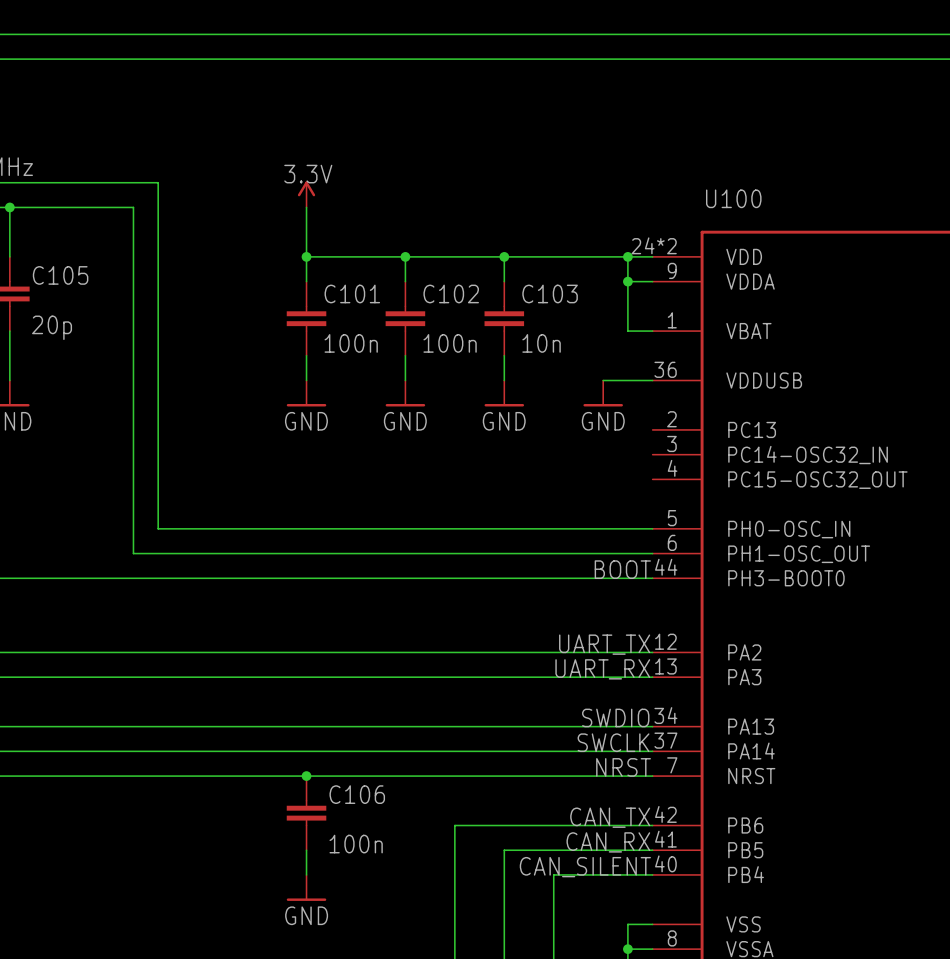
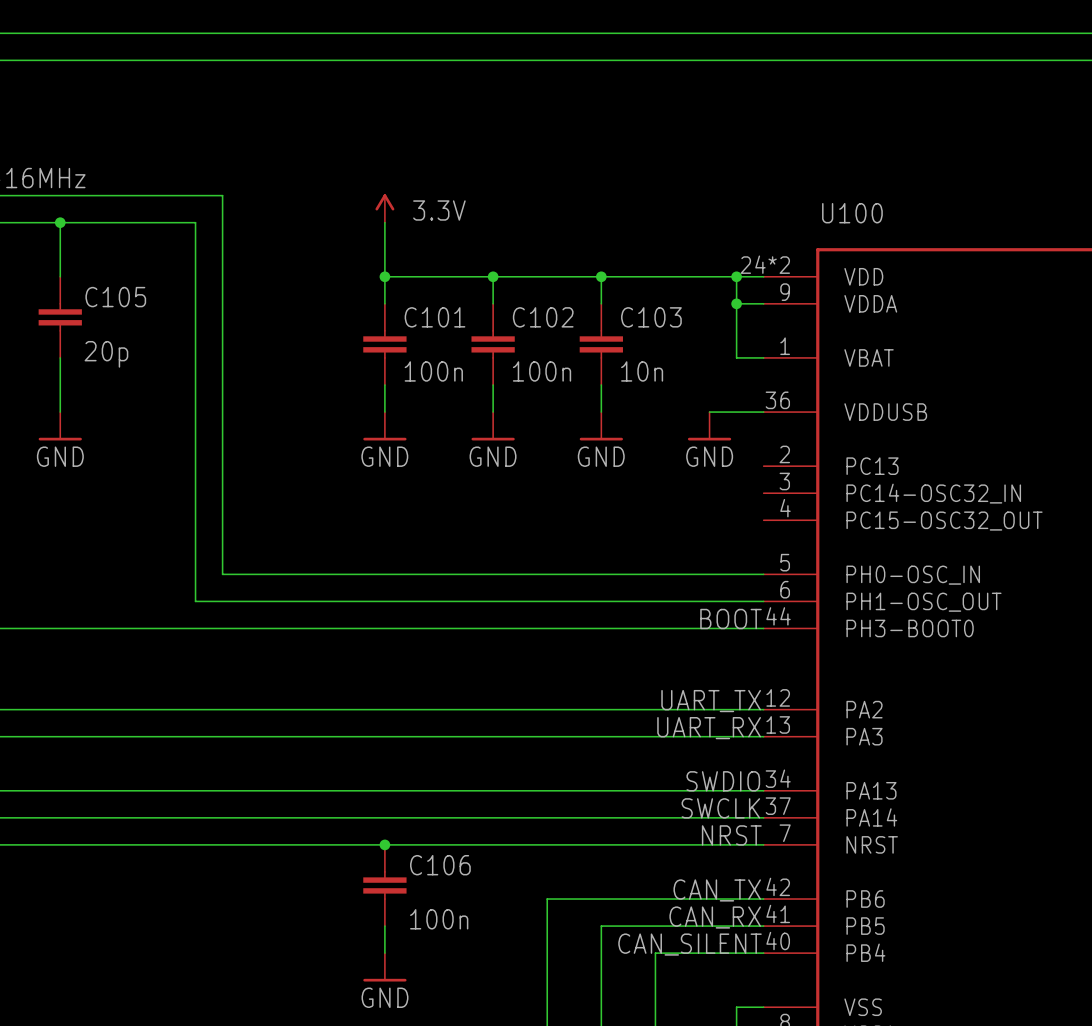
power symbol text position: 3.3V (308, 174) -> 3.3V (439, 210)

